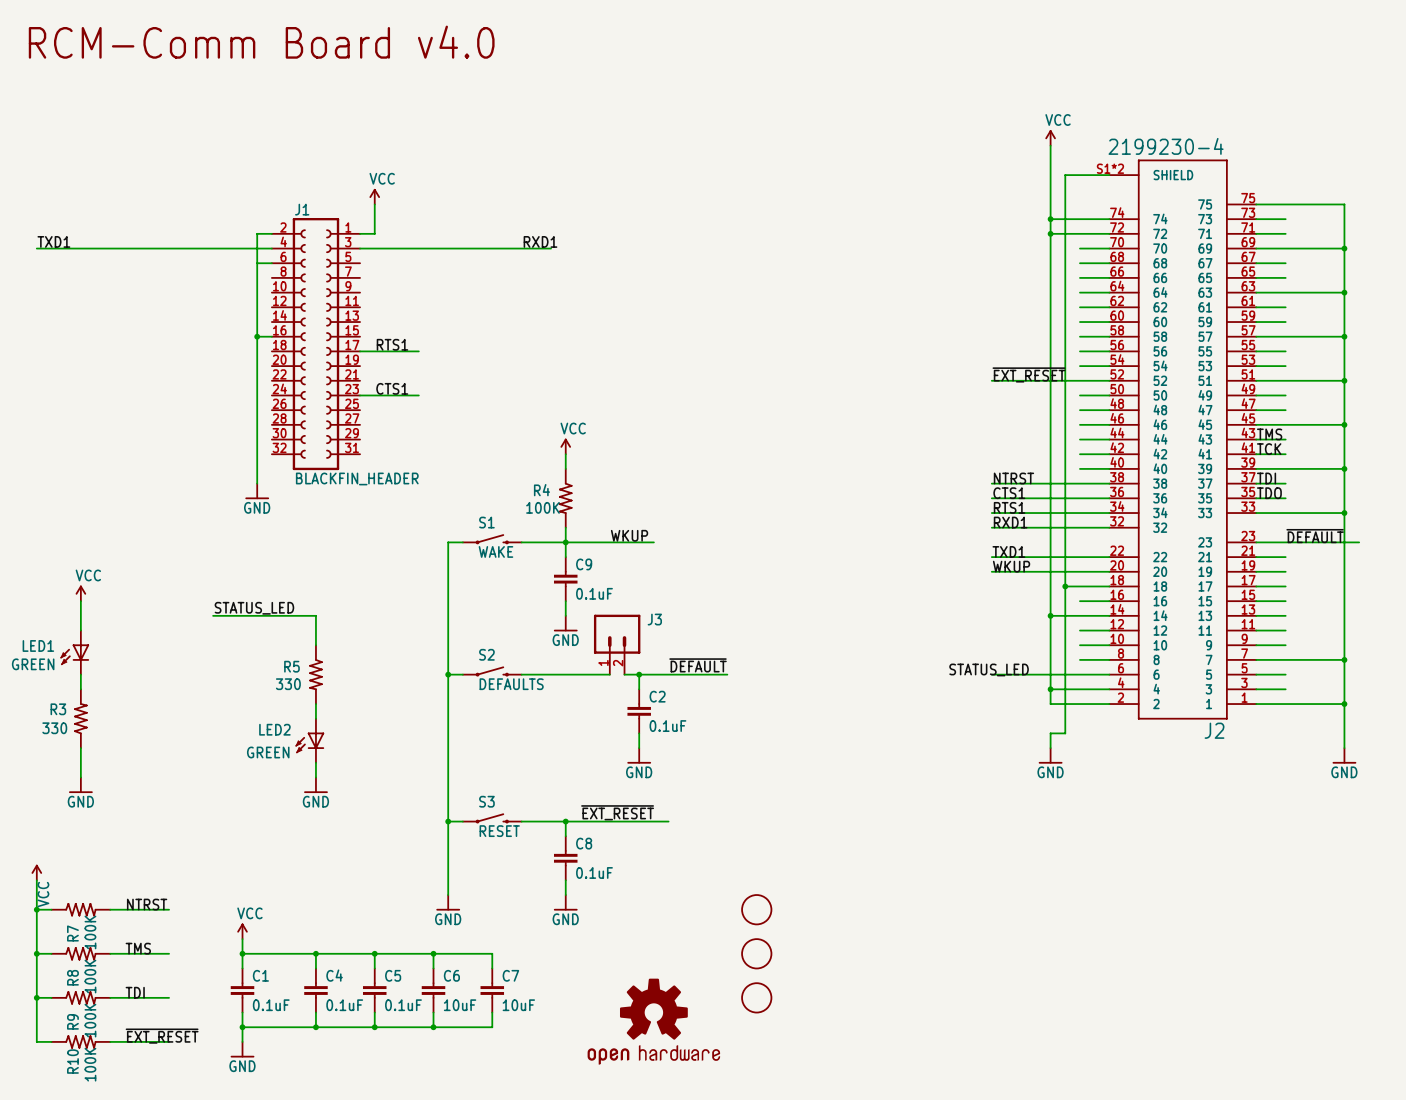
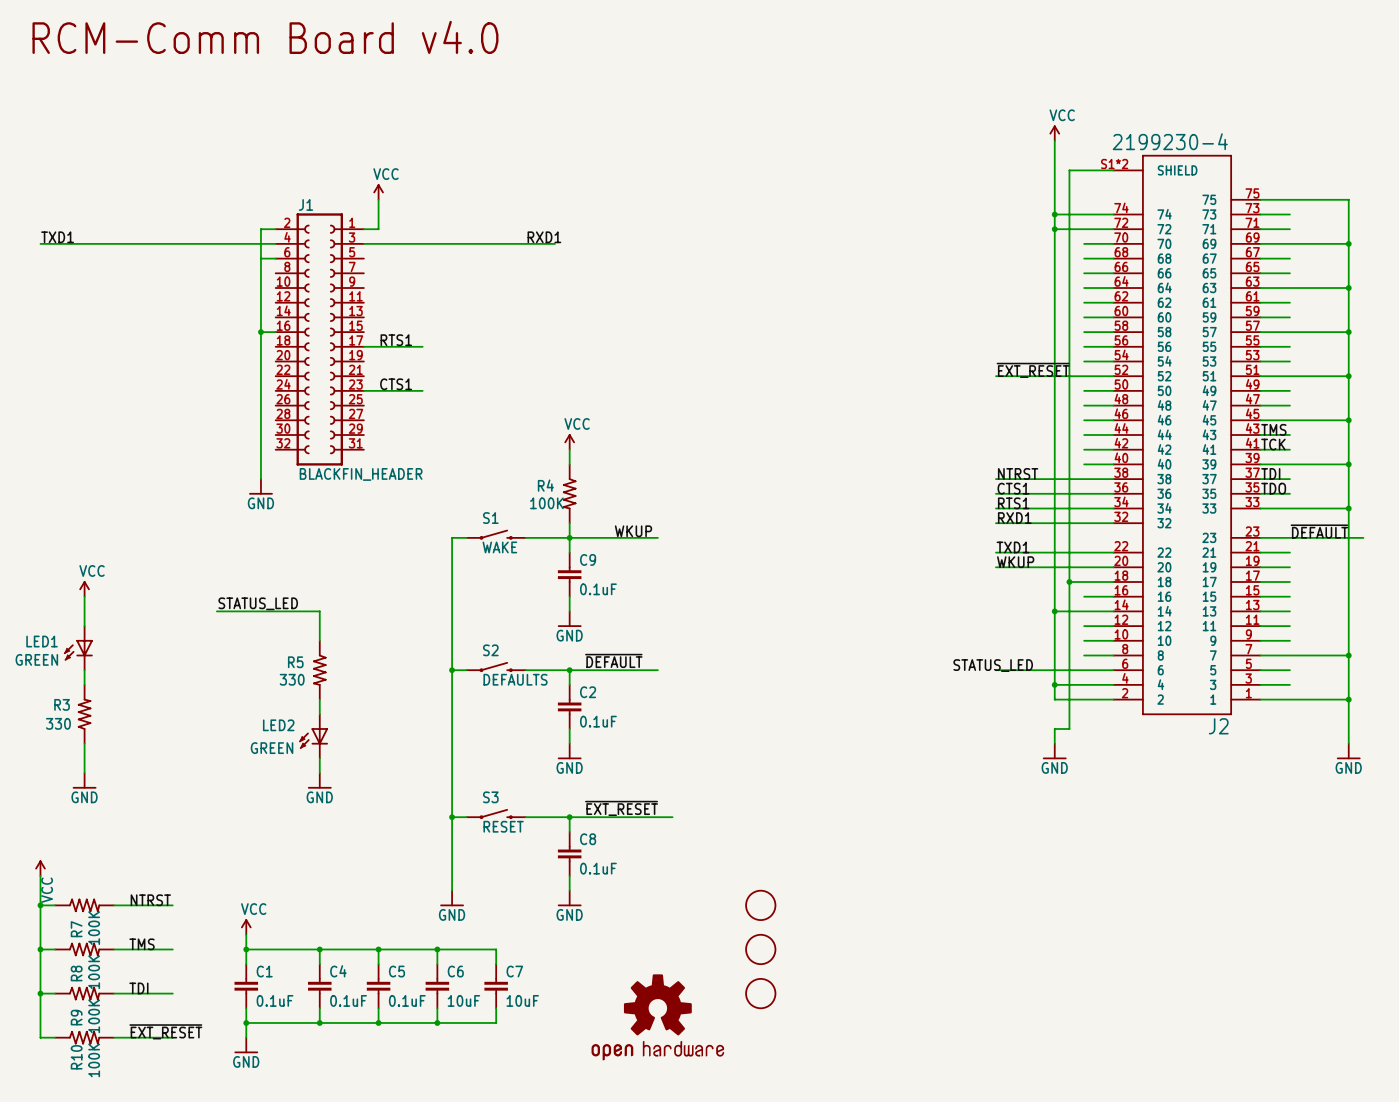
J3: (617, 644) -> none
label position: ~{DEFAULT} (698, 665) -> ~{DEFAULT} (613, 660)
junction: none -> (569, 670)
wire: none -> (613, 670) (628, 670)
wire: (639, 674) (639, 689) -> (569, 670) (569, 684)
junction: (639, 674) -> none
wire: (653, 674) (727, 674) -> none
C2 position: (639, 711) -> (569, 706)
wire: (639, 733) (639, 748) -> (569, 728) (569, 743)
power symbol position: GND (639, 755) -> GND (569, 751)

